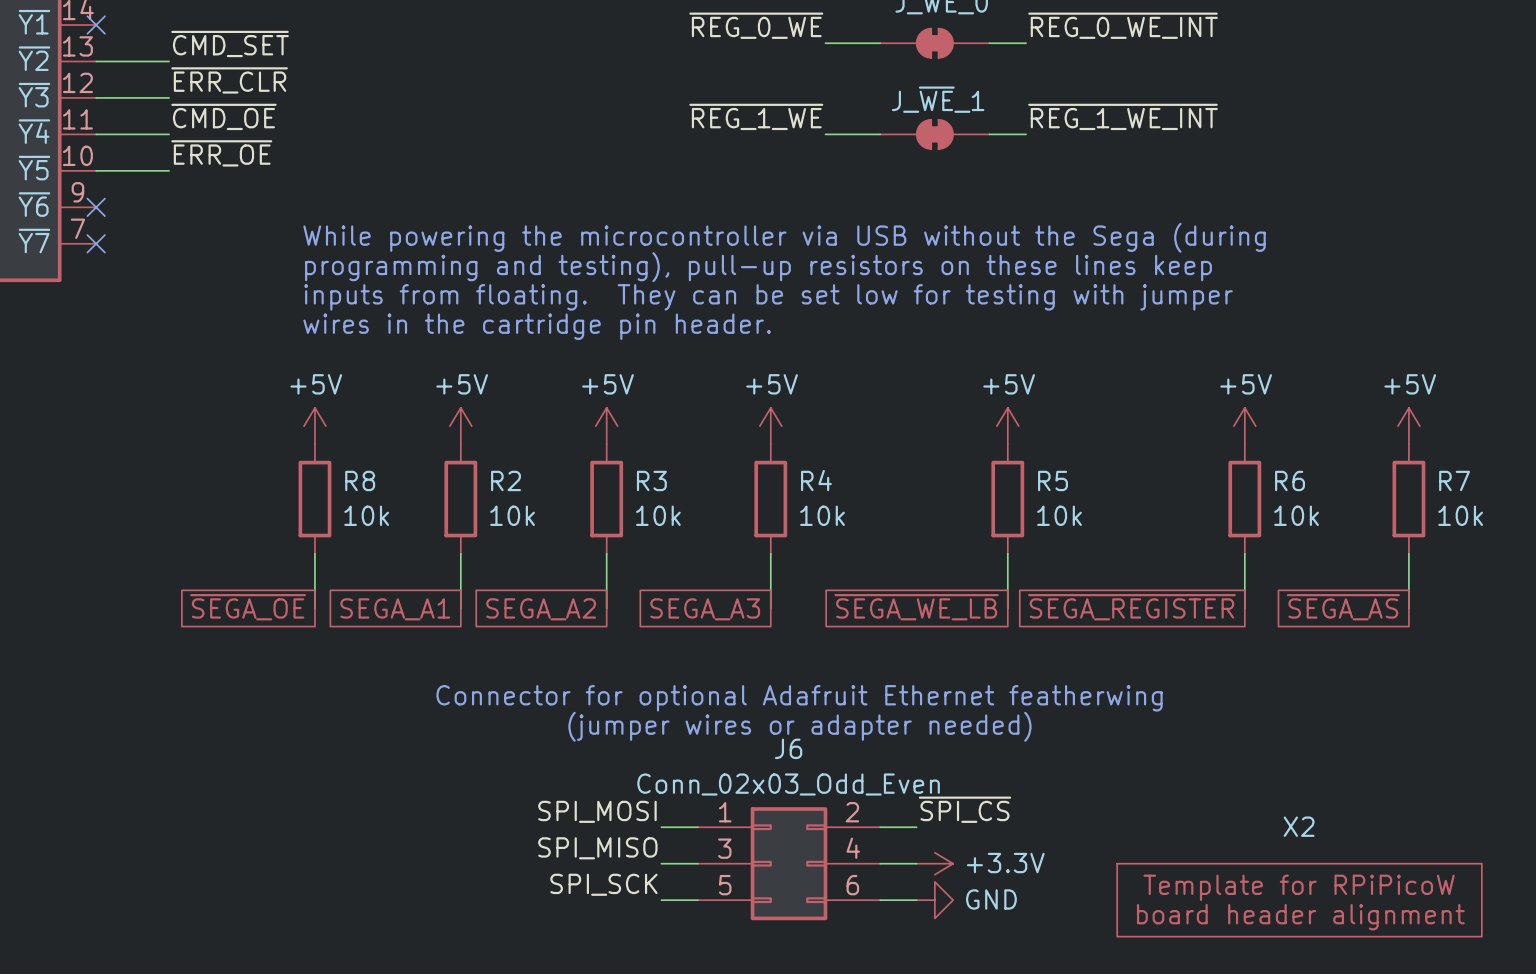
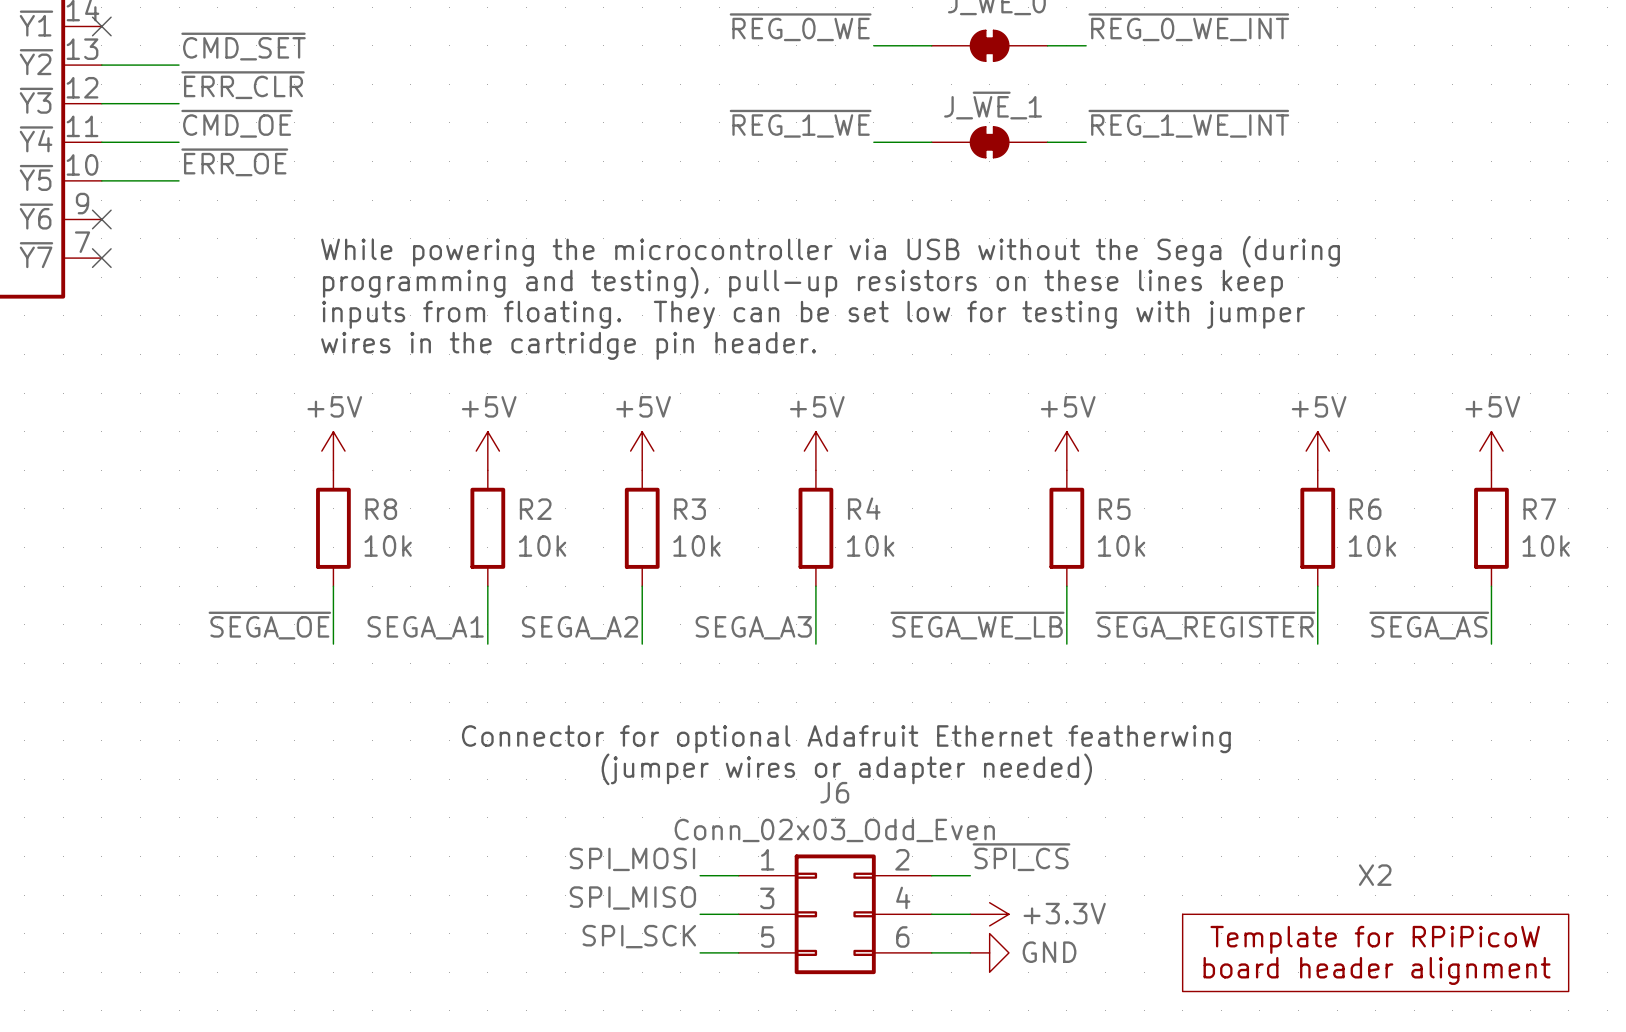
label: none -> ~{SEGA_OE} (269, 625)
label: none -> ~{SEGA_WE_LB} (977, 625)
label: none -> ~{SEGA_REGISTER} (1205, 625)
label: none -> ~{SEGA_AS} (1429, 625)
label: none -> SEGA_A1 (425, 627)
label: none -> SEGA_A2 (580, 627)
label: none -> SEGA_A3 (753, 627)
global label: ~{SEGA_OE} (248, 607) -> none
global label: ~{SEGA_WE_LB} (916, 607) -> none
global label: ~{SEGA_REGISTER} (1131, 607) -> none
global label: ~{SEGA_AS} (1343, 607) -> none
global label: SEGA_A1 (395, 609) -> none
global label: SEGA_A2 (541, 609) -> none
global label: SEGA_A3 (705, 609) -> none

